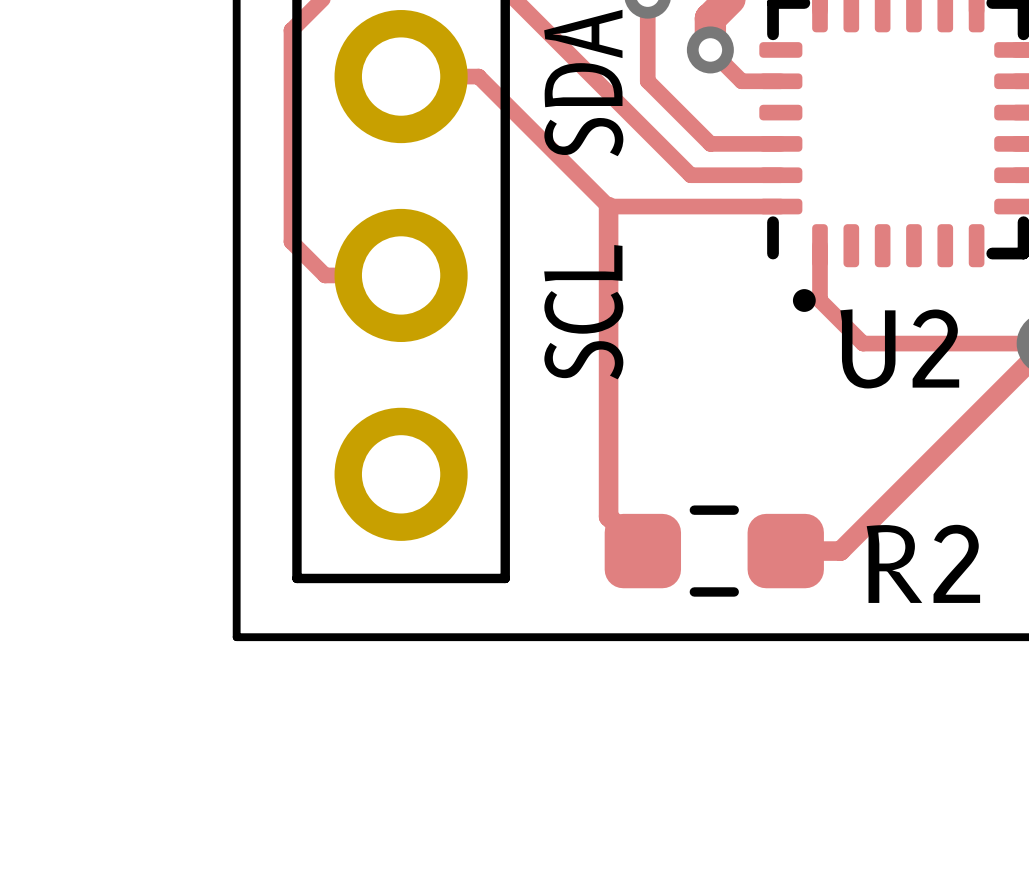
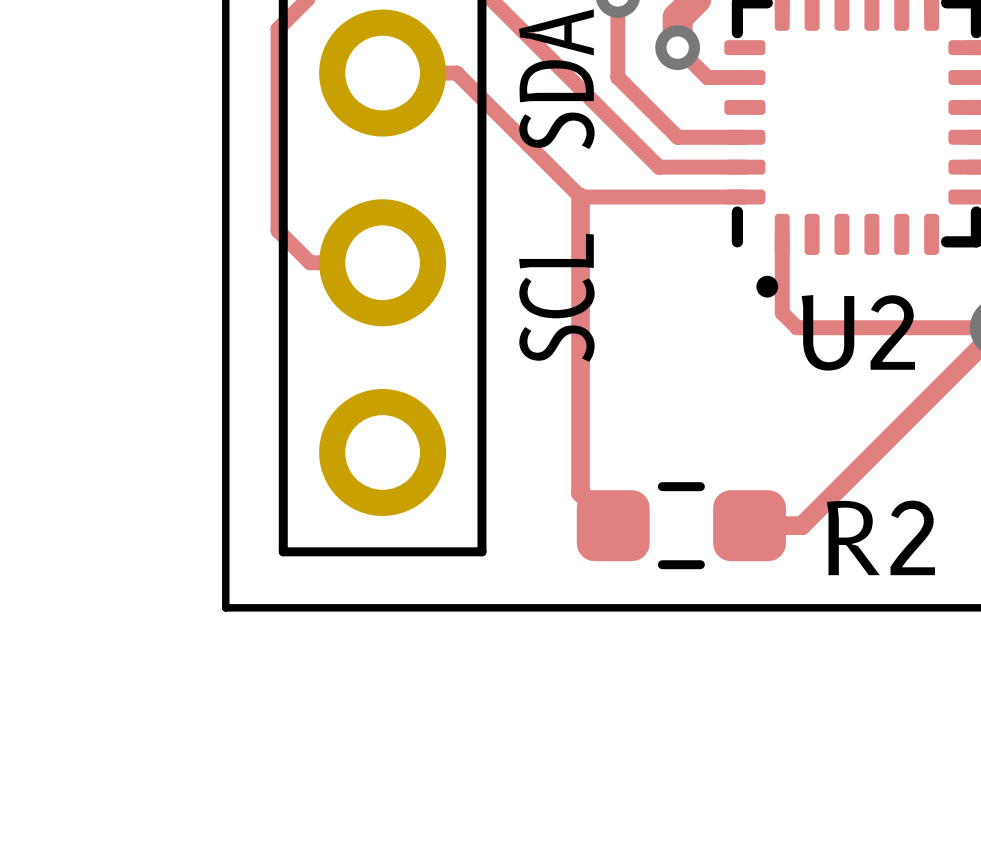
track: (819, 300) (863, 343) -> (782, 286) (782, 312) (797, 327) (823, 327)

